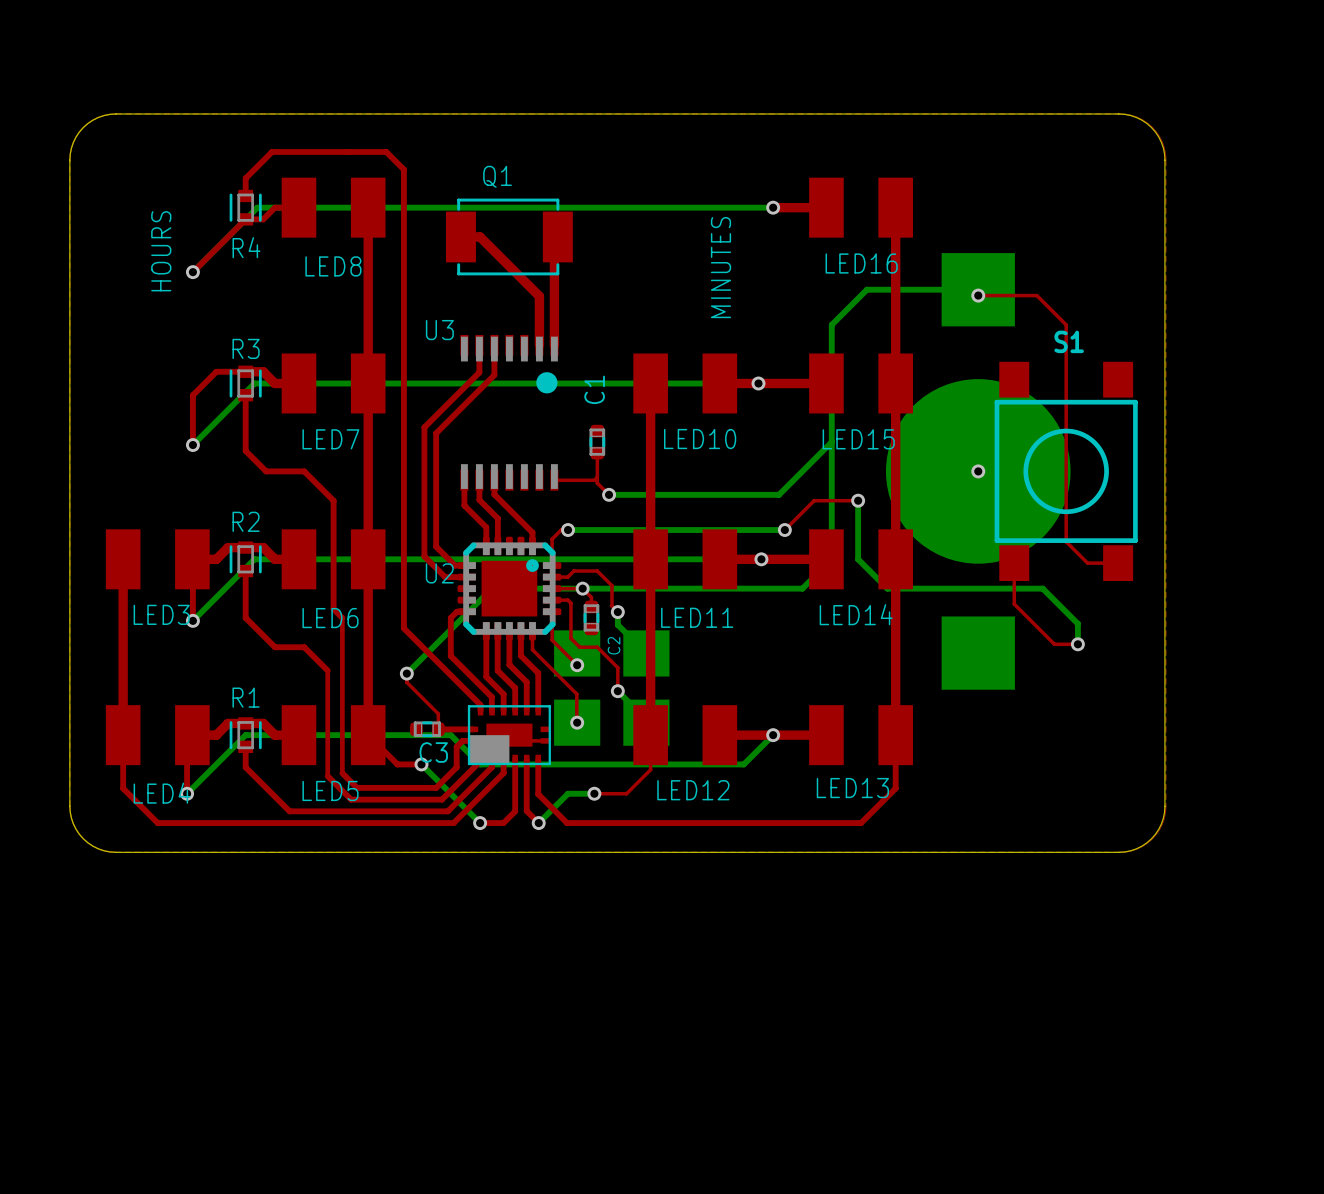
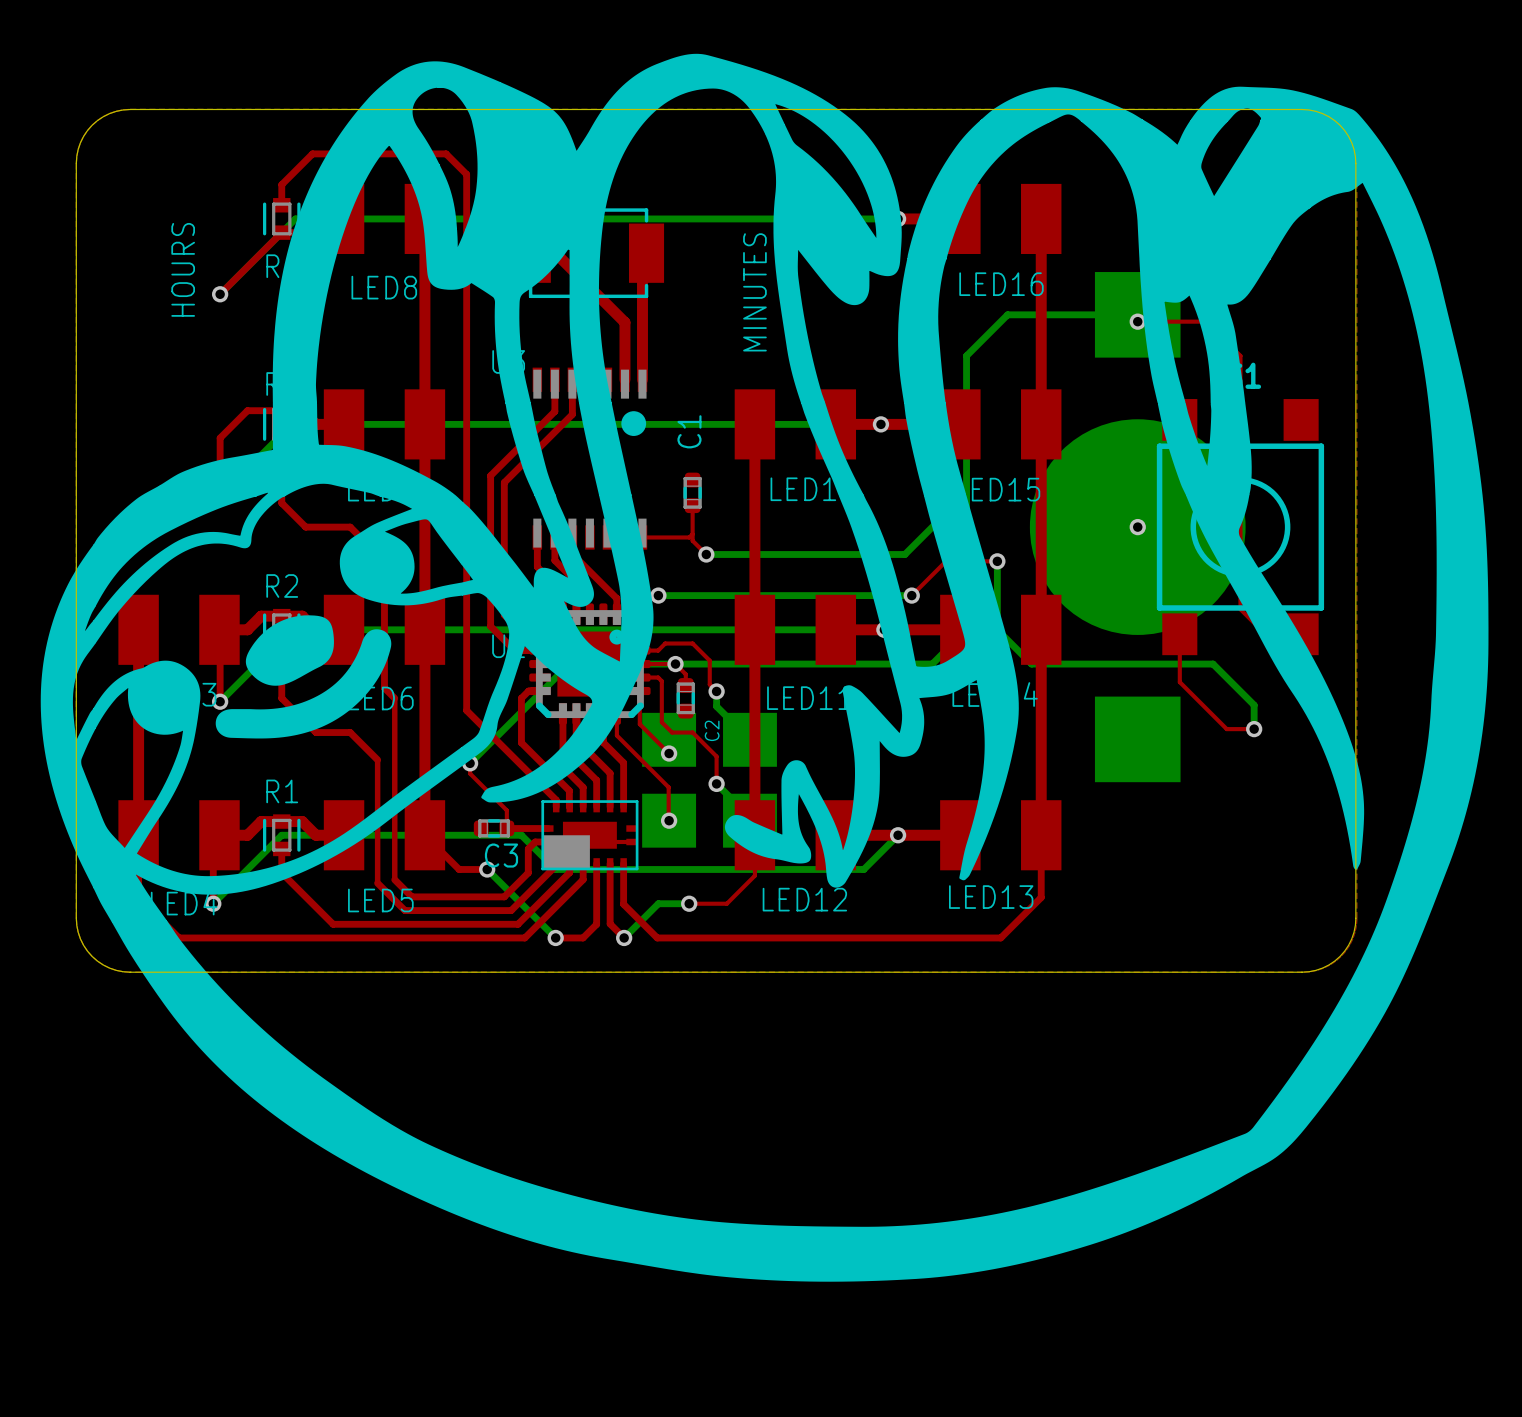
drawing: none -> [40, 53, 1489, 1282]
text position: MINUTES (720, 267) -> MINUTES (754, 292)

